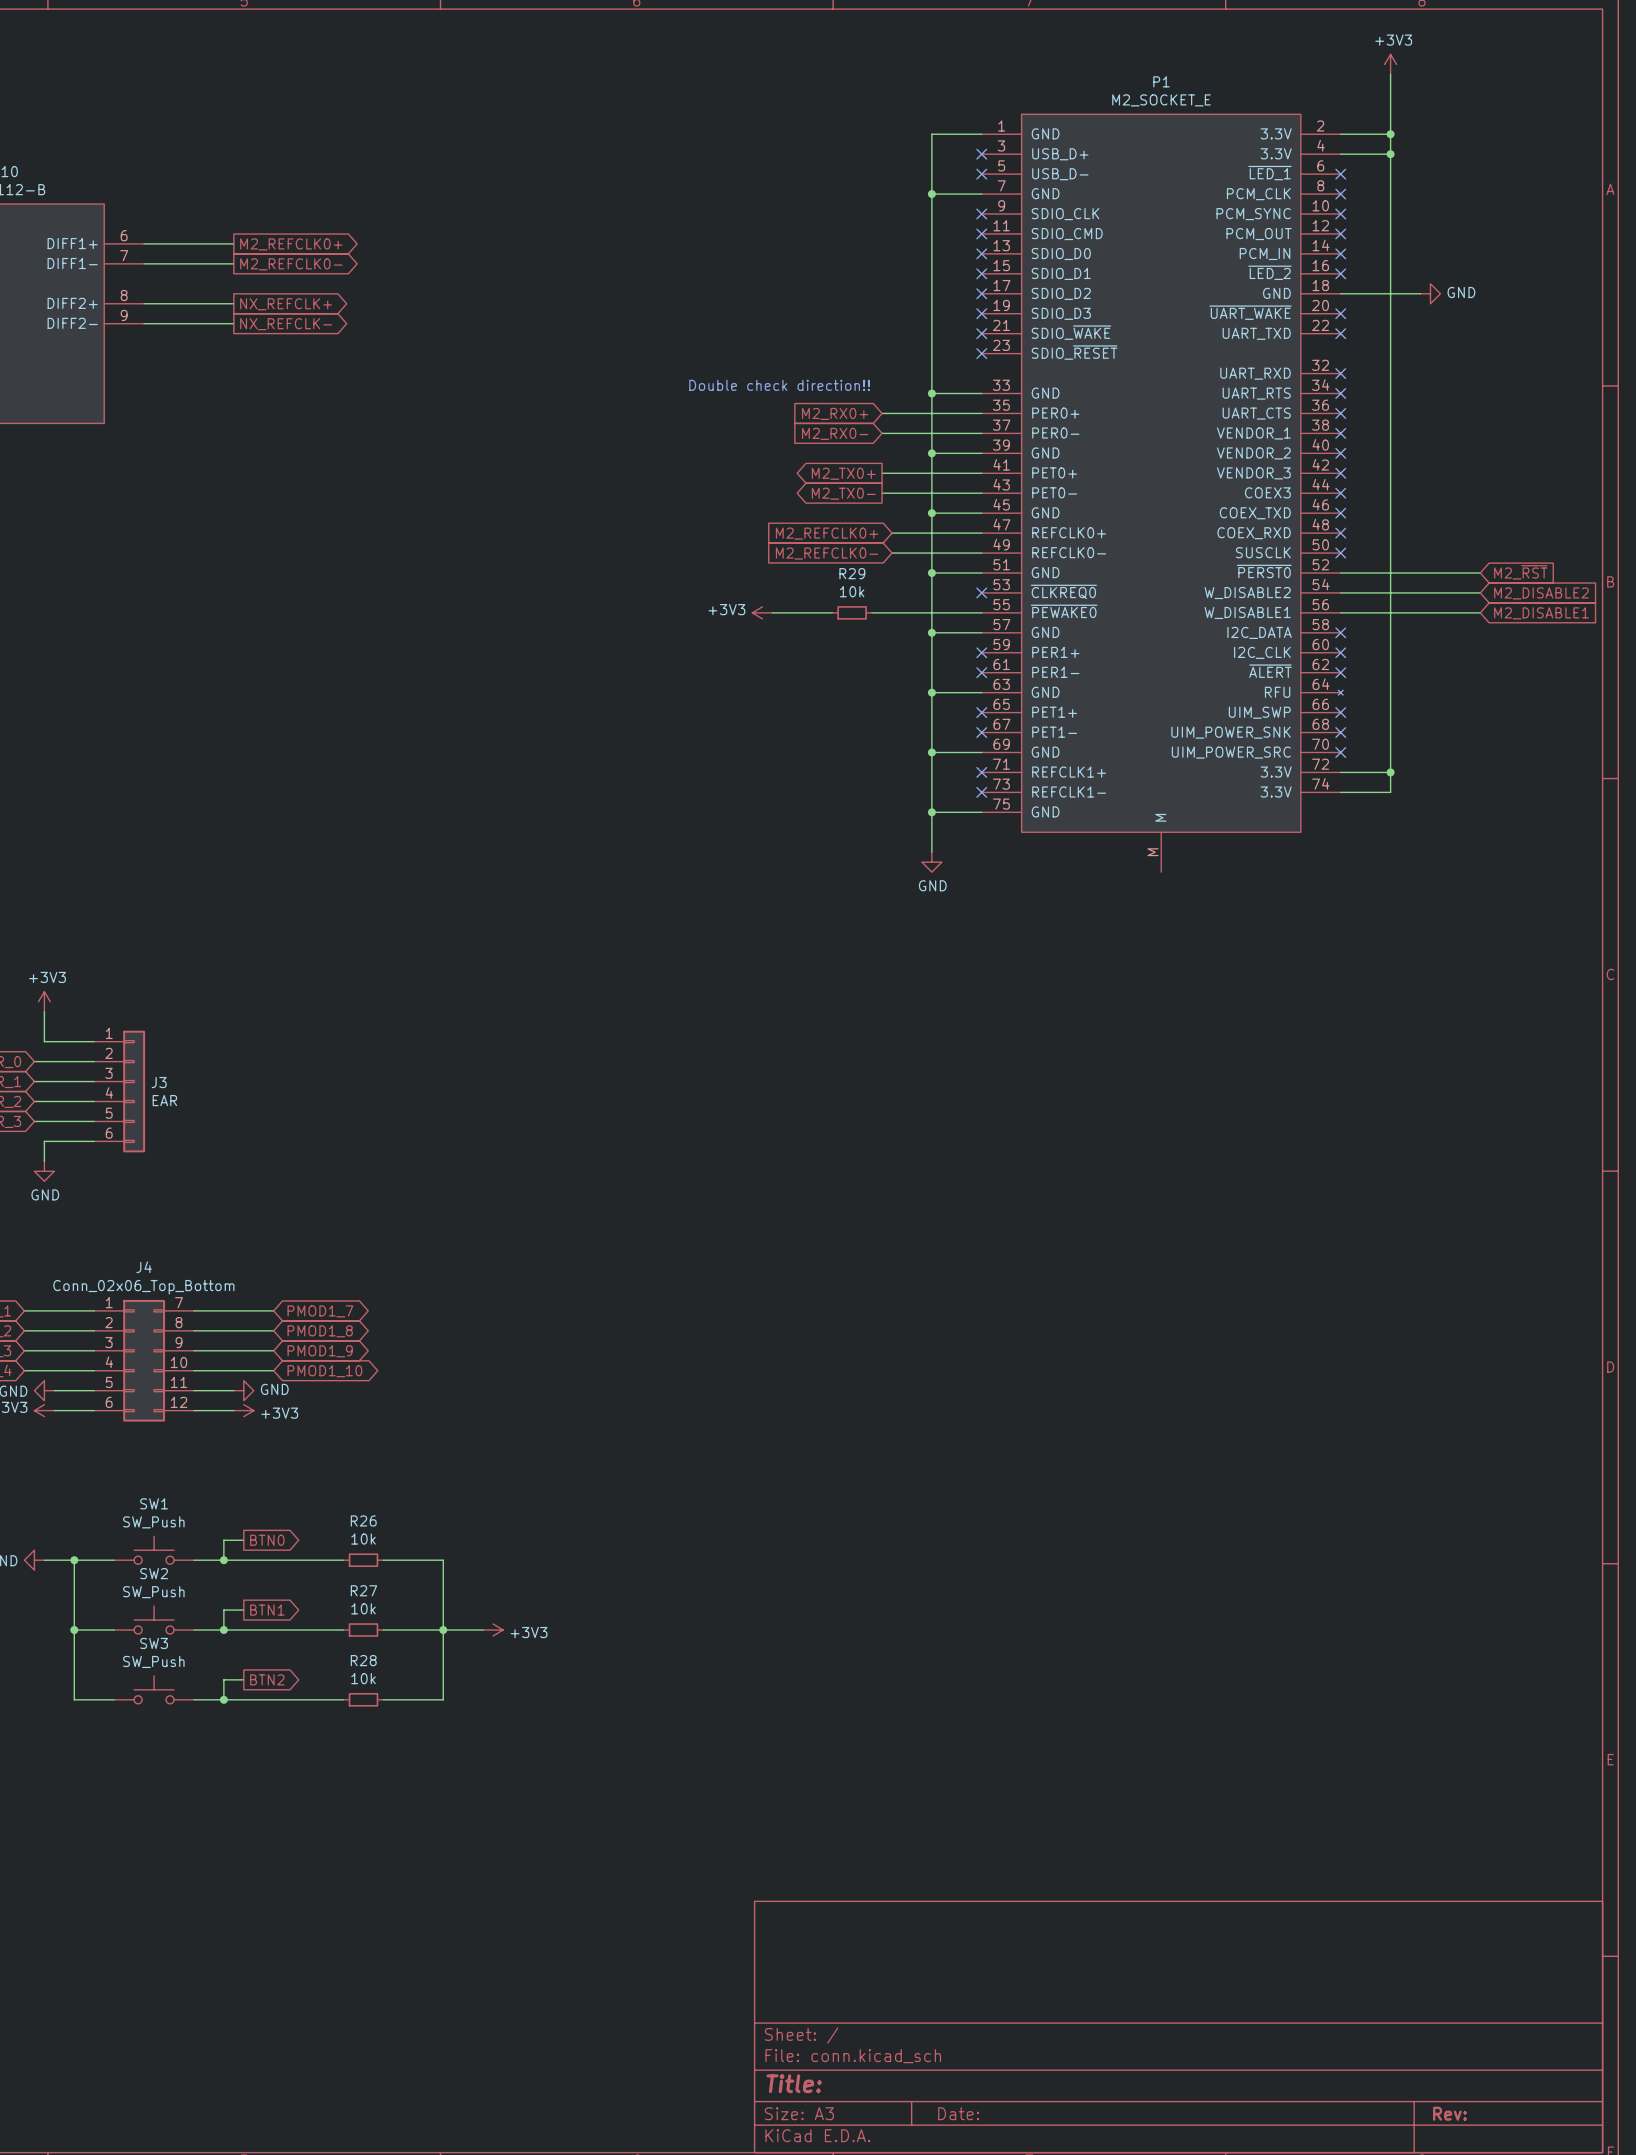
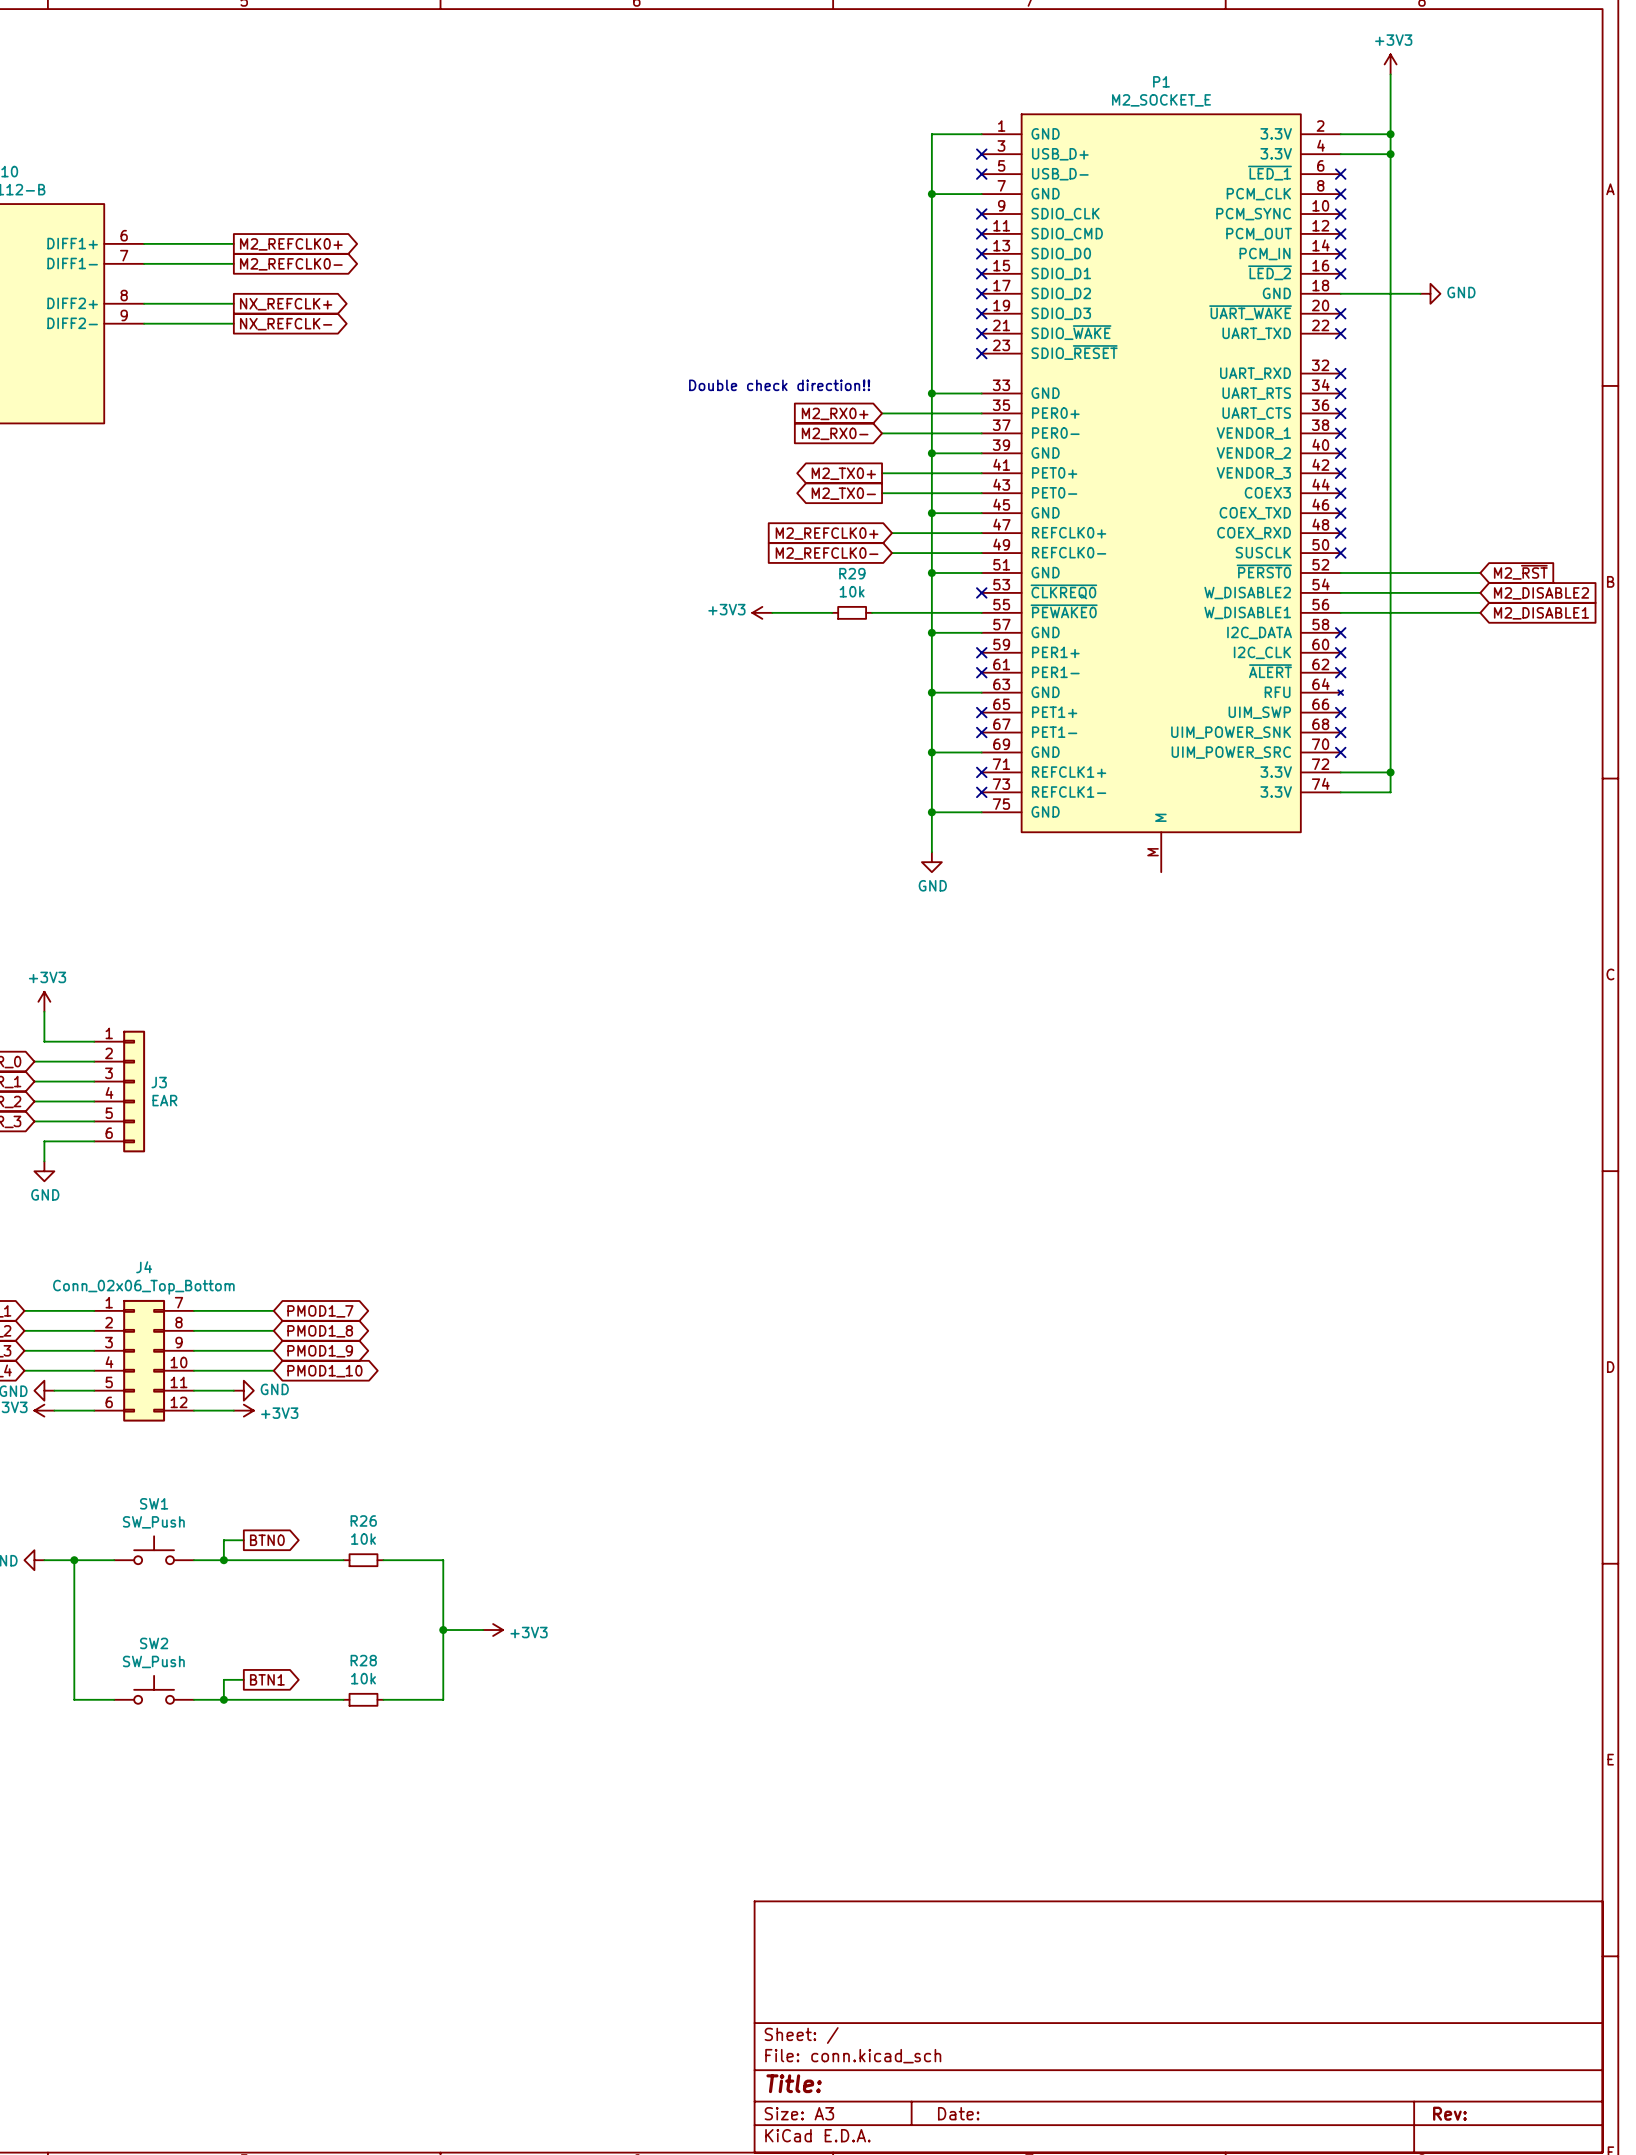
wire: (243, 1610) (223, 1610) (223, 1630) -> none
global label: BTN1 (267, 1610) -> none
SW2: SW_Push (154, 1620) -> none
wire: (74, 1630) (114, 1630) -> none
junction: (74, 1630) -> none
wire: (193, 1630) (343, 1630) -> none
junction: (223, 1630) -> none
R27: 10k (363, 1630) -> none
wire: (383, 1630) (443, 1630) -> none
SW3 name: SW3 (154, 1643) -> SW2 (154, 1643)
global label: BTN2 (267, 1679) -> BTN1 (267, 1679)

